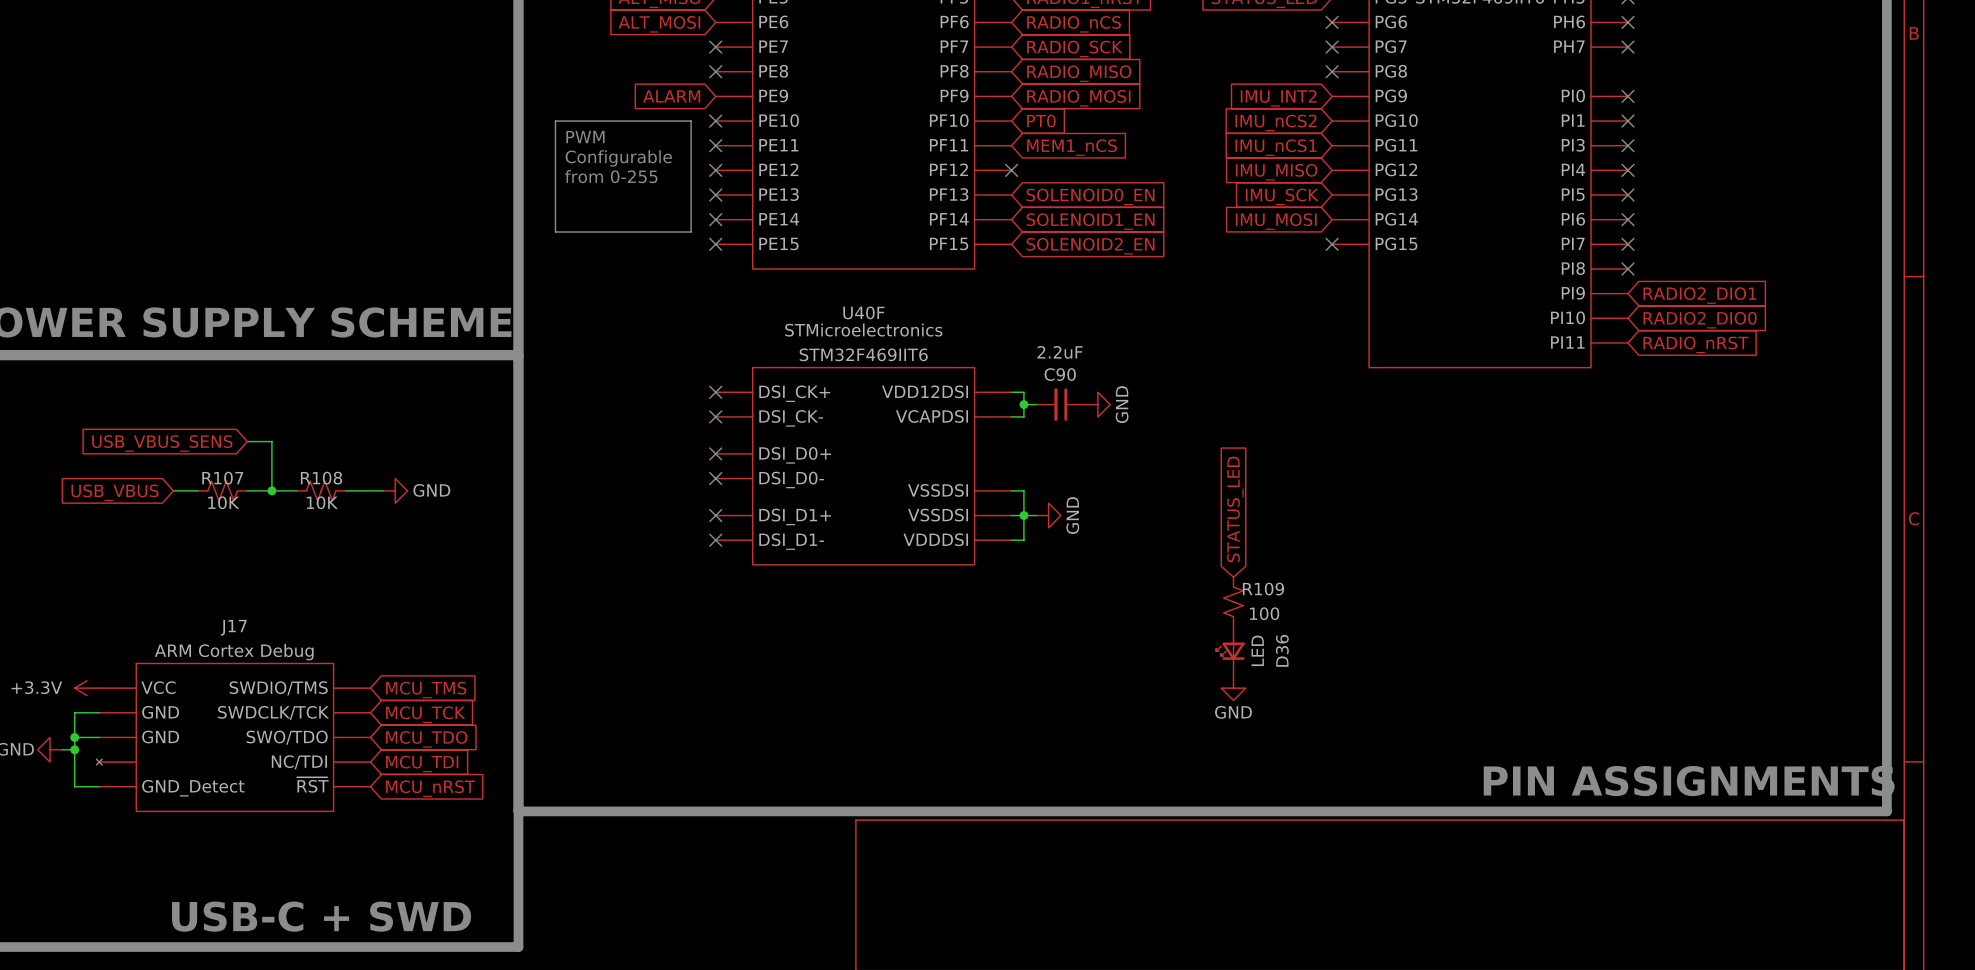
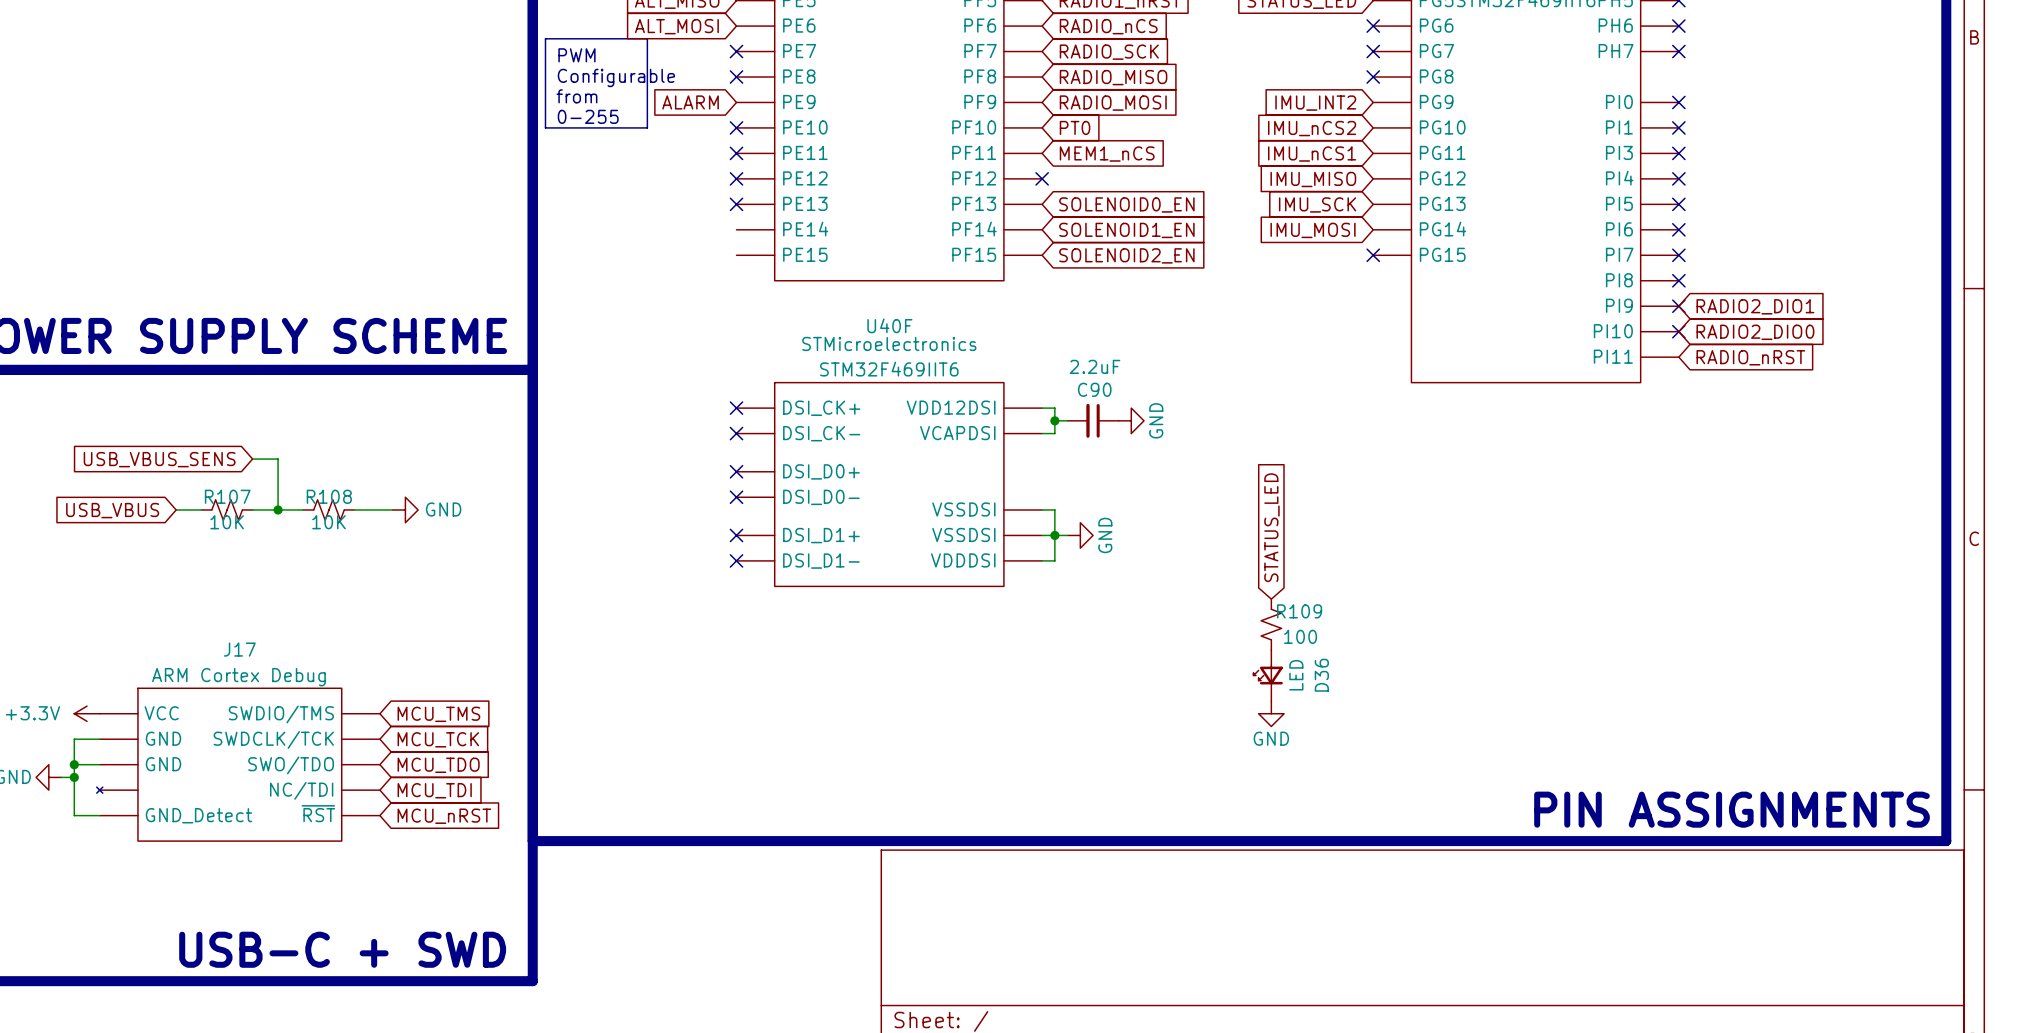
text: none -> from (576, 96)
text: none -> 0-255 (588, 116)
line: (555, 121) (555, 232) (691, 232) (691, 121) (629, 121) -> (570, 127) (545, 127) (545, 38) (647, 38) (647, 127)
text position: PWM (585, 137) -> PWM (576, 55)
text position: Configurable (618, 158) -> Configurable (616, 77)
text: from 0-255 (611, 176) -> none
no-connect mark: (715, 219) -> none
no-connect mark: (715, 244) -> none
no-connect mark: none -> (1678, 306)
no-connect mark: none -> (1678, 331)

